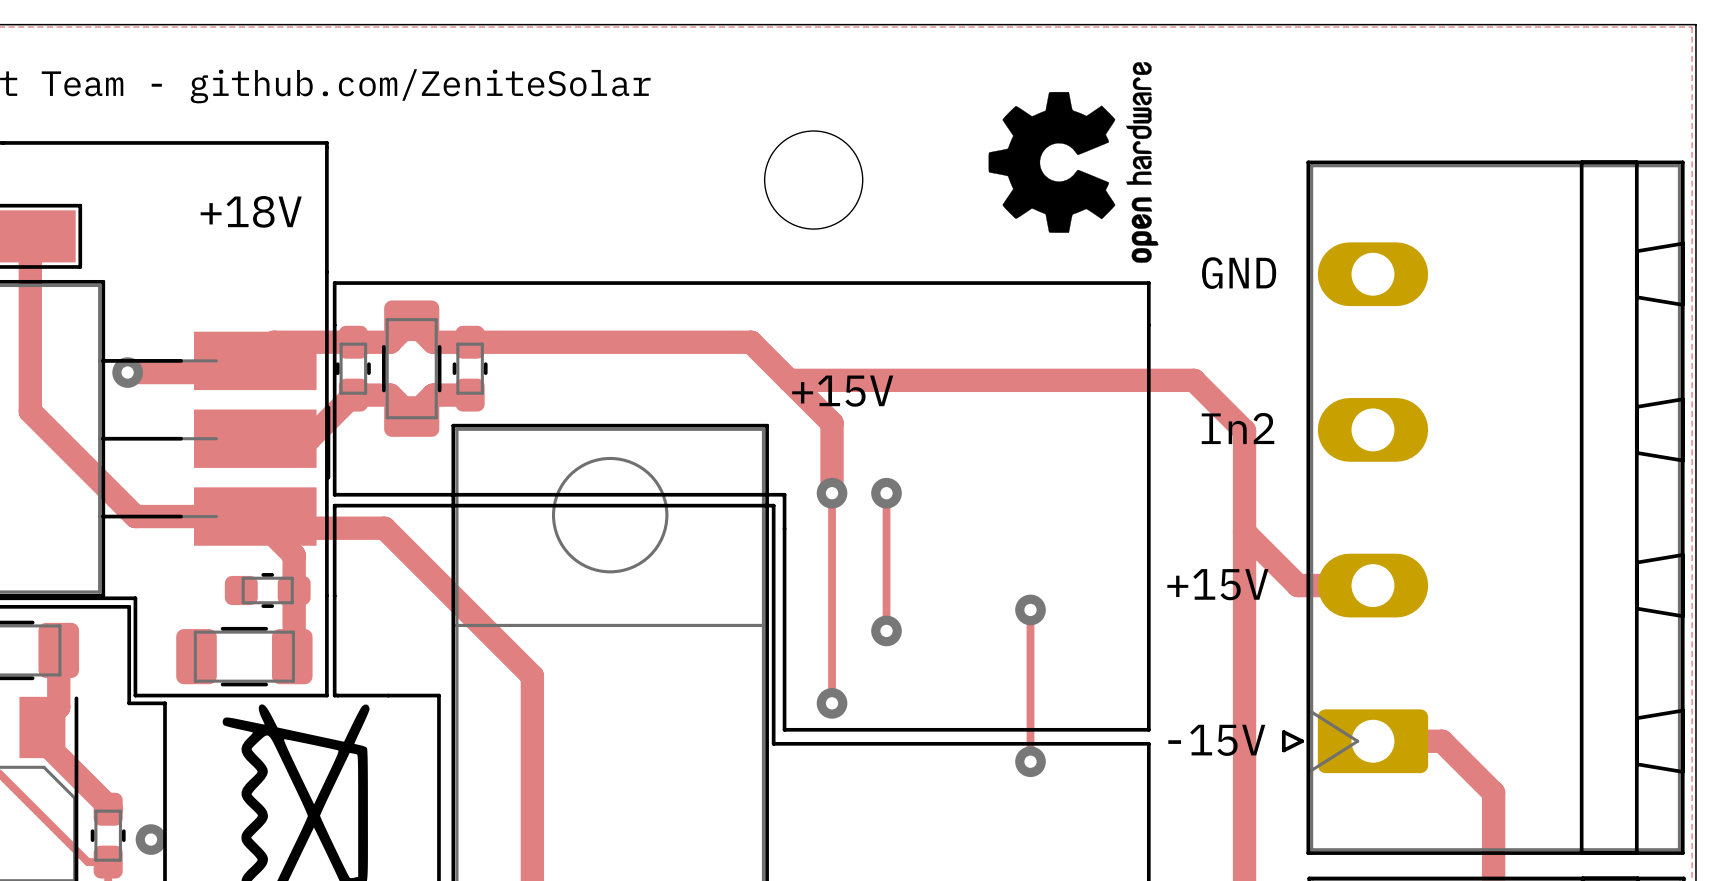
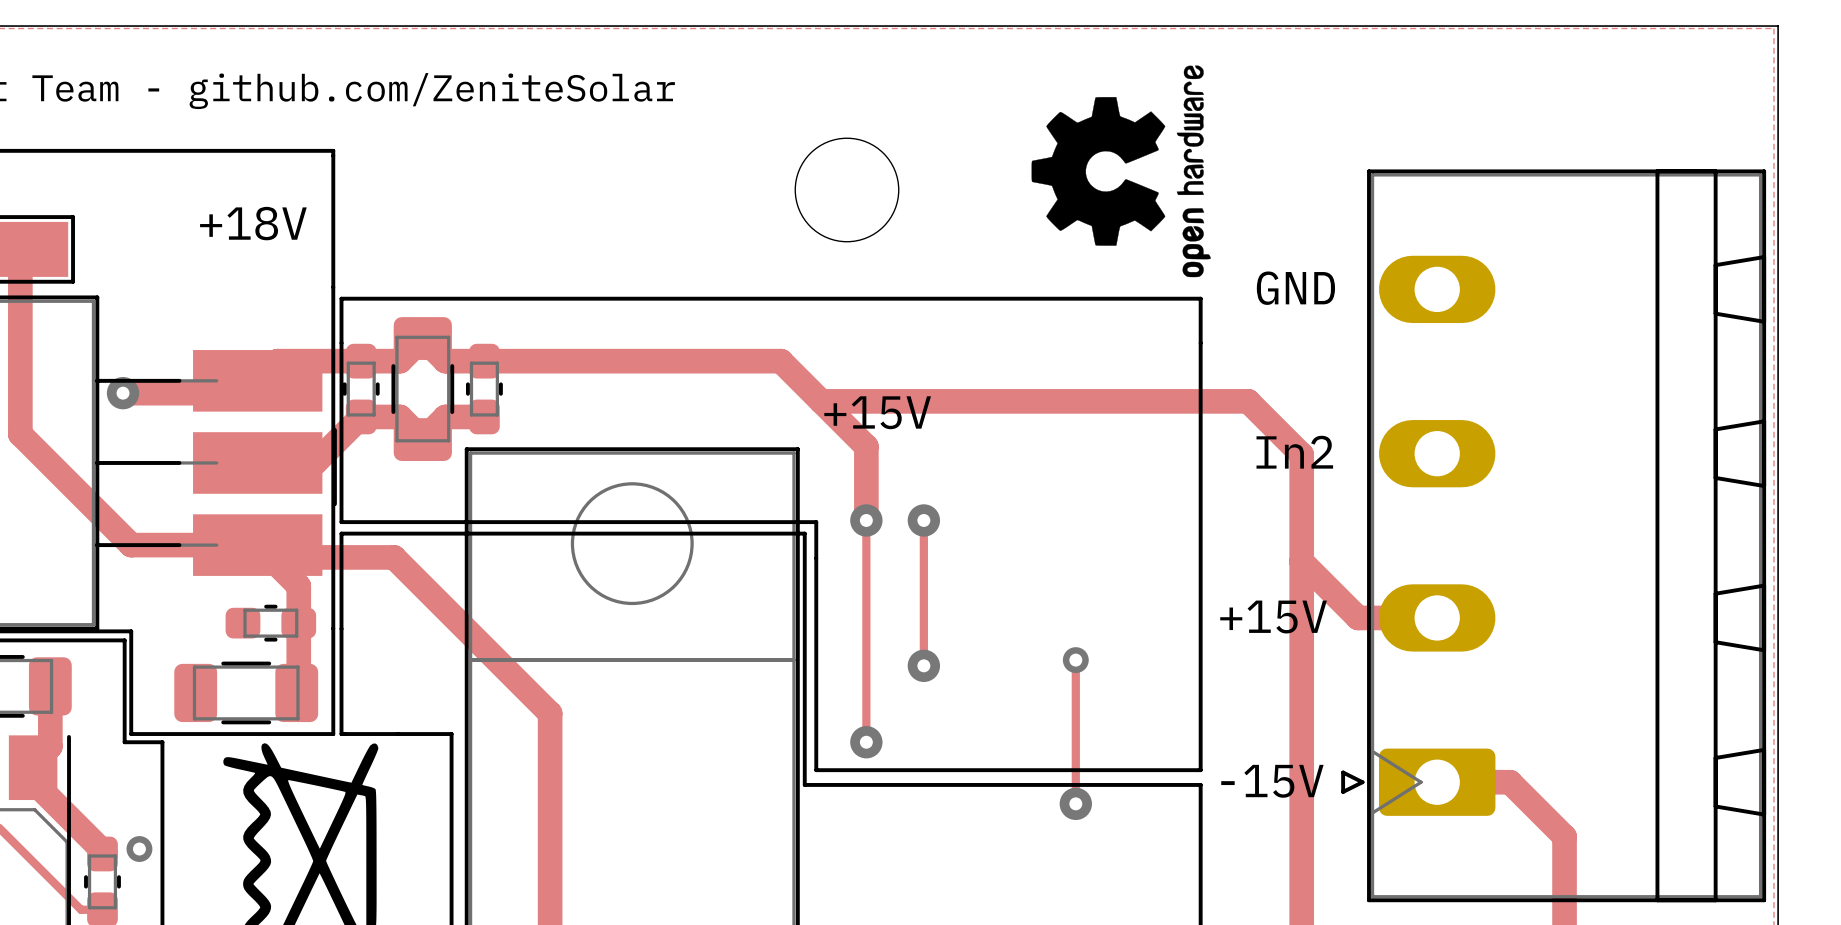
via position: (1030, 609) -> (1075, 660)
via: none -> (139, 849)
via: (150, 839) -> none

